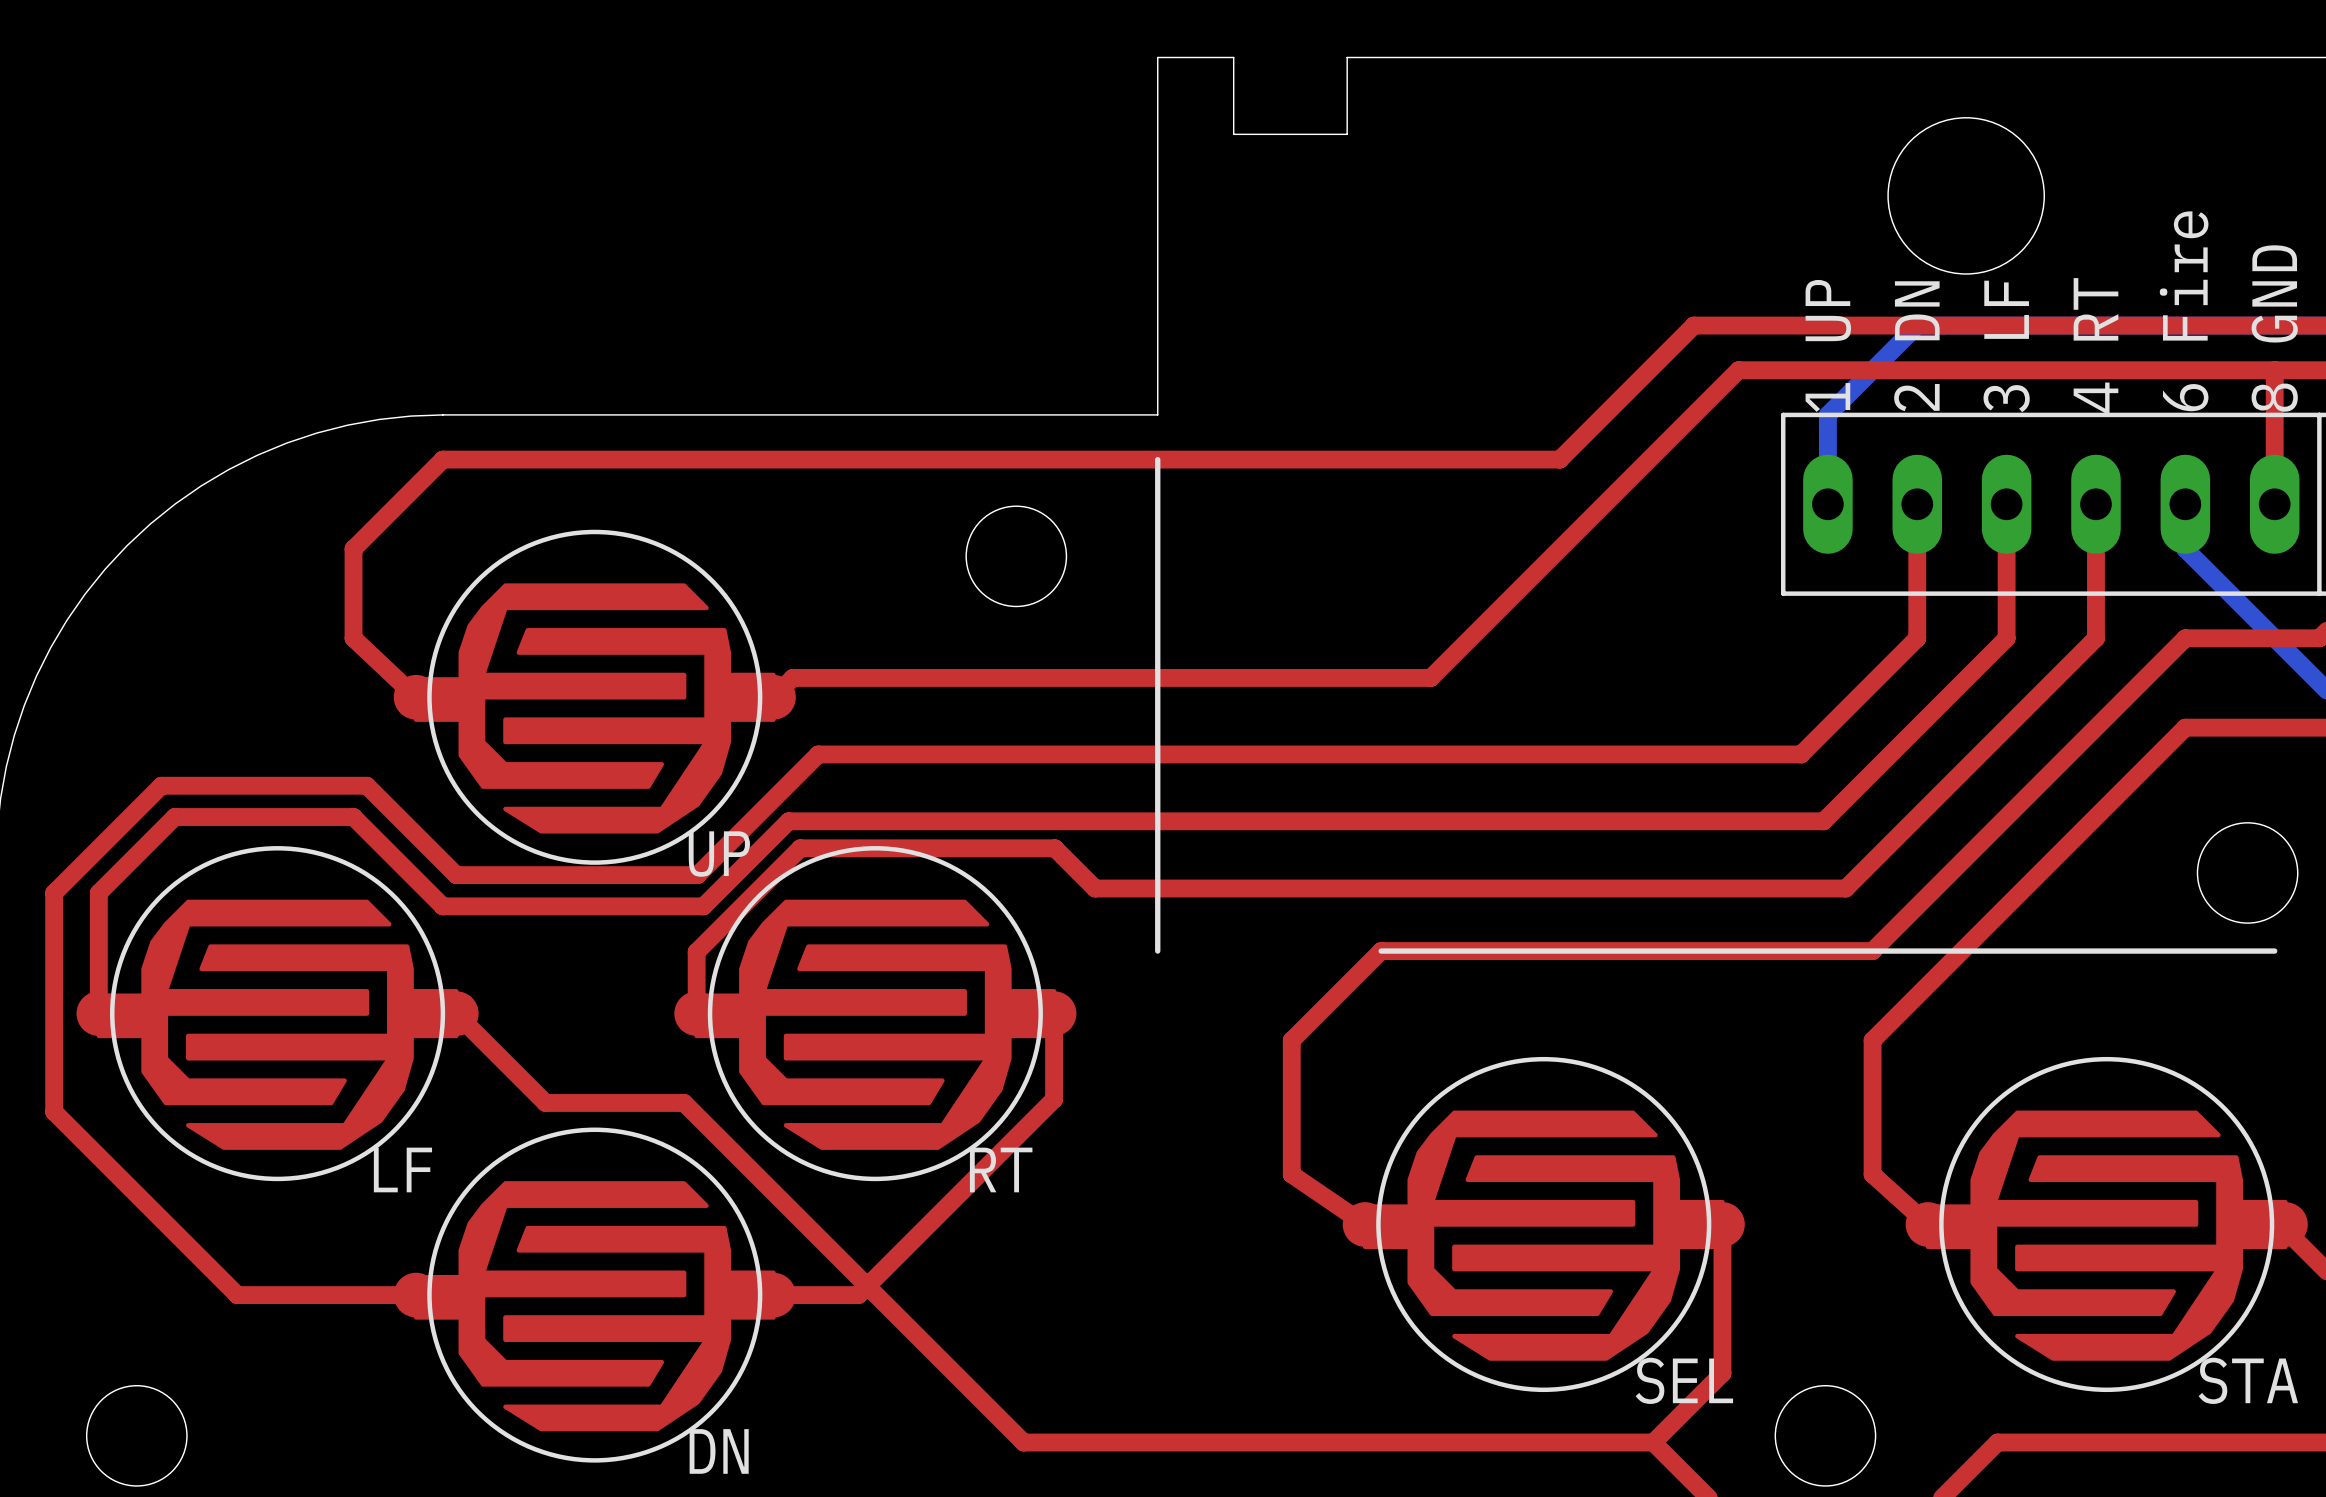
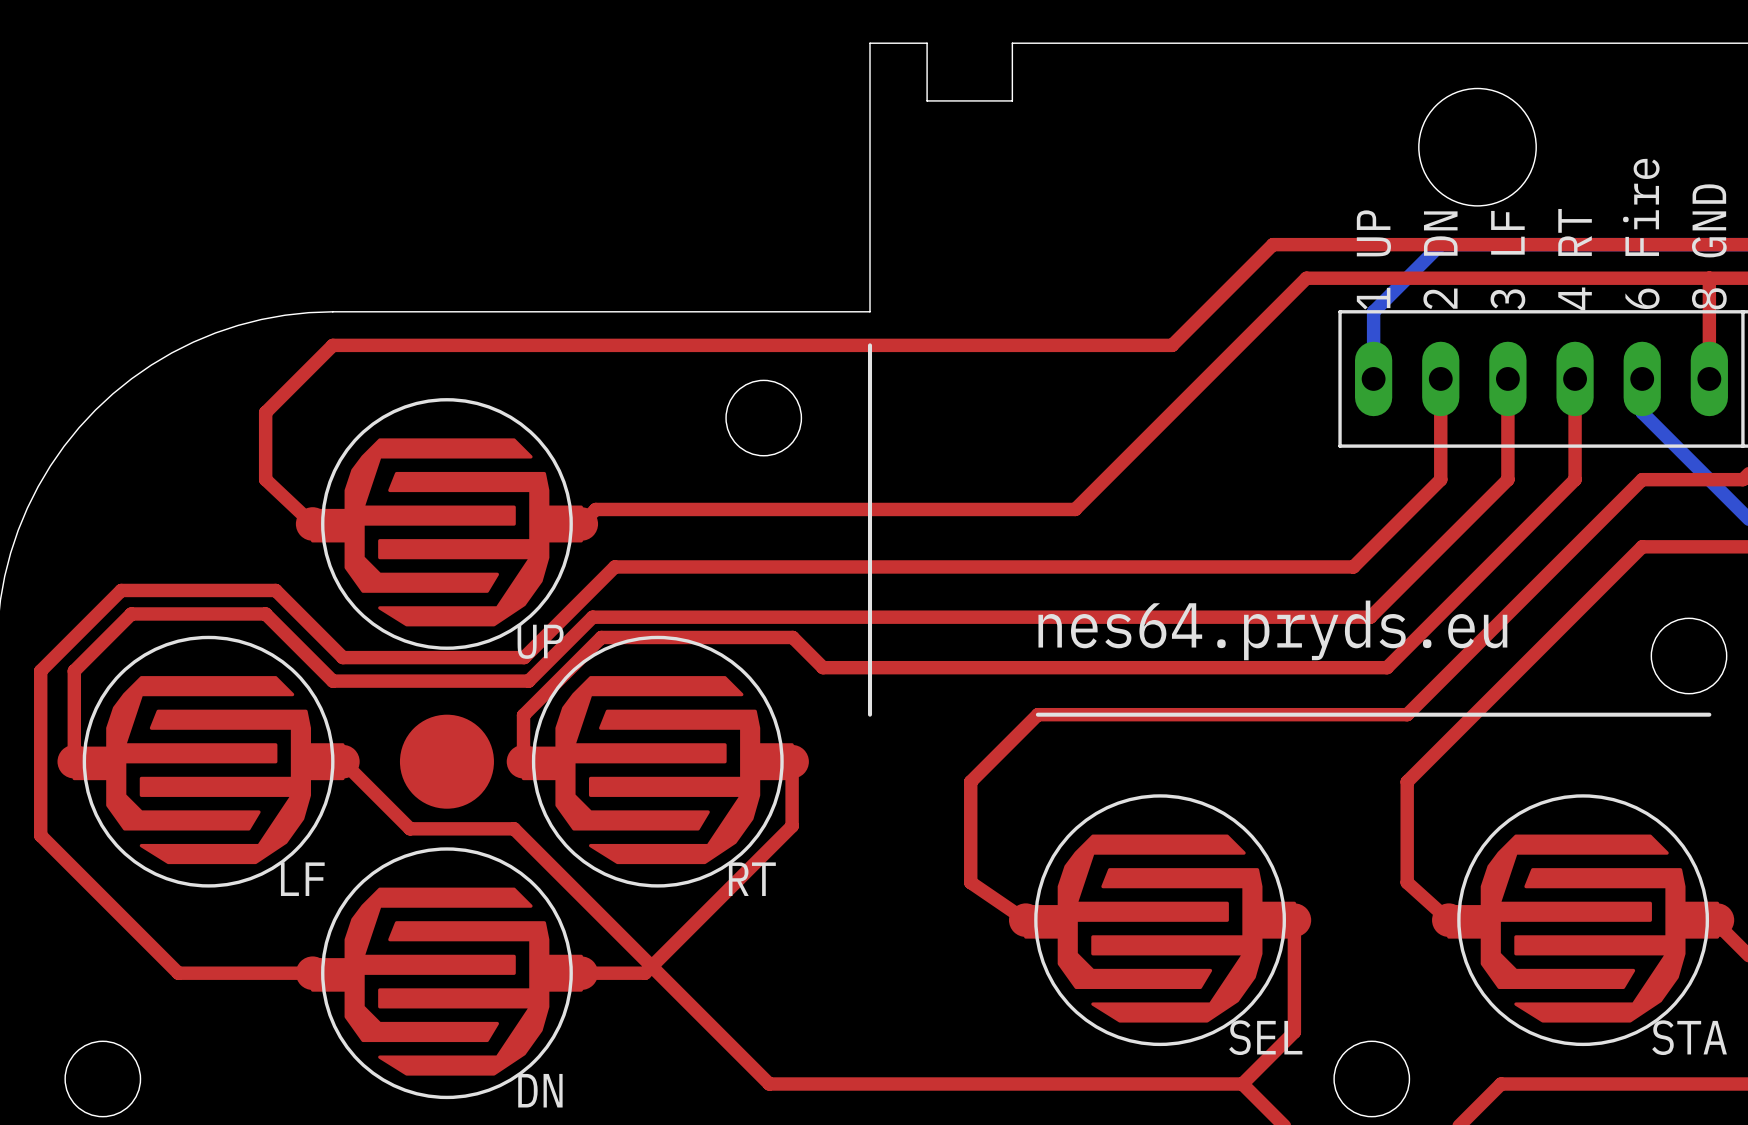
text: none -> nes64.pryds.eu (1272, 630)
drawing: none -> [399, 714, 494, 809]

